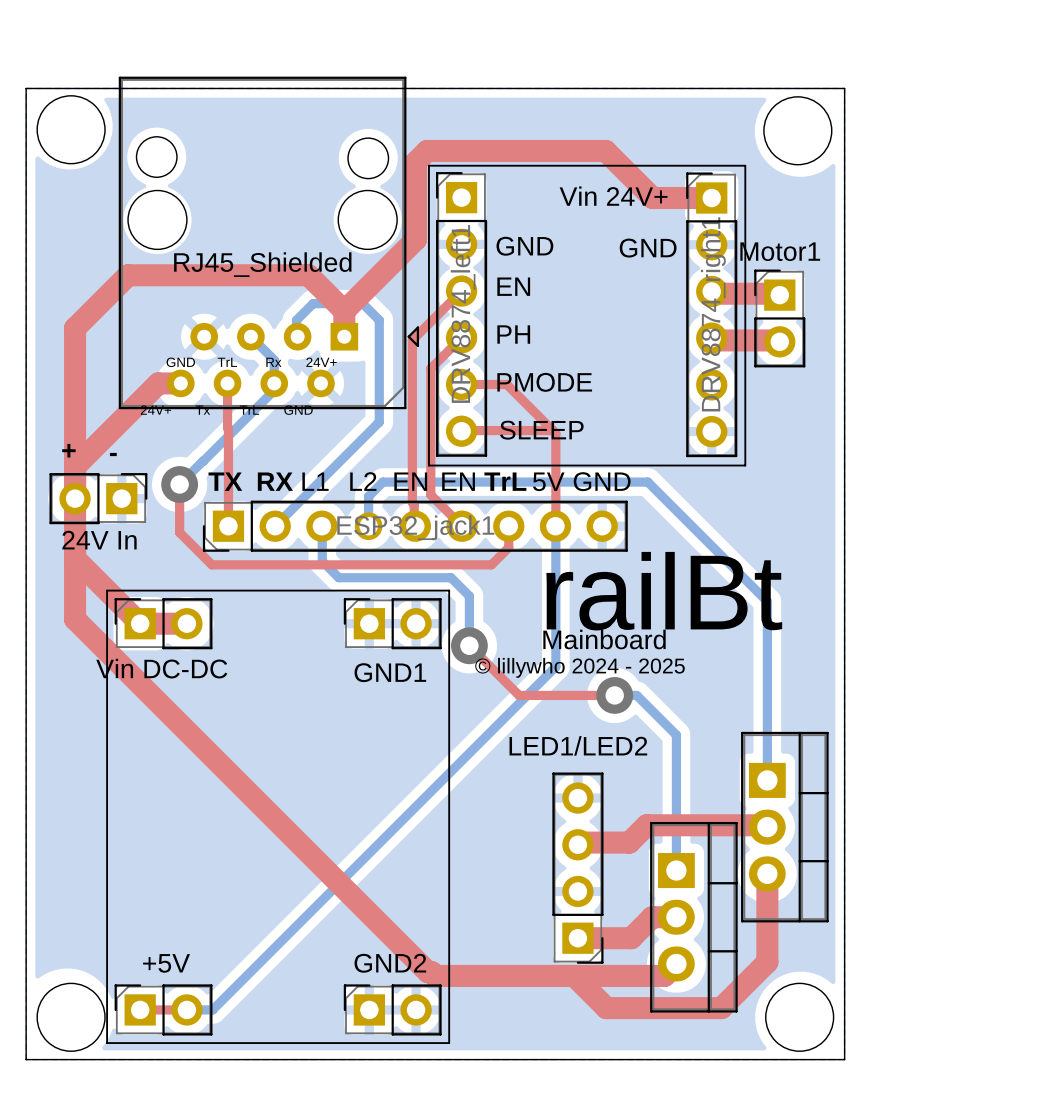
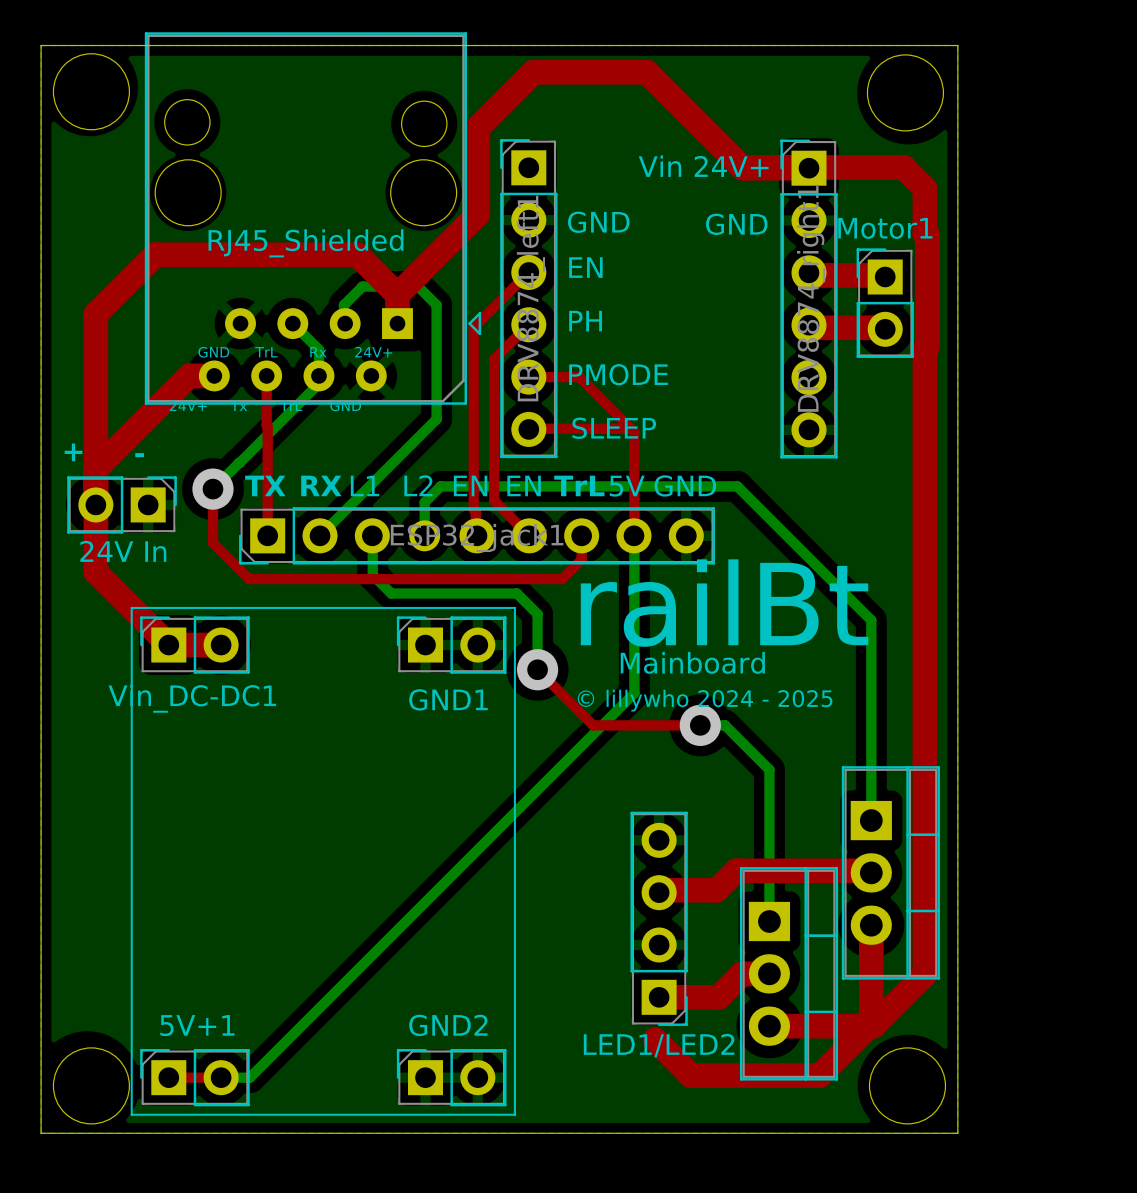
top track: (427, 151) (605, 151) -> (490, 115) (533, 72) (647, 72) (690, 115)
line: (428, 165) (745, 165) (745, 465) (428, 465) (428, 165) -> none
text position: + (68, 450) -> + (73, 452)
top track: (75, 558) (75, 619) (428, 972) (431, 972) (435, 975) (664, 975) (676, 963) -> (742, 167) (903, 167) (924, 188) (924, 234) (927, 234) (927, 346) (924, 349) (924, 974) (873, 1026) (769, 1026)
text position: railBt (664, 591) -> railBt (724, 603)
text position: © lillywho 2024 - 2025 (580, 667) -> © lillywho 2024 - 2025 (705, 700)
Vin DC-DC name: Vin DC-DC (161, 668) -> Vin_DC-DC1 (192, 698)
LED1/LED2 name position: LED1/LED2 (578, 745) -> LED1/LED2 (659, 1045)
+5V name: +5V (166, 963) -> 5V+1 (197, 1025)

